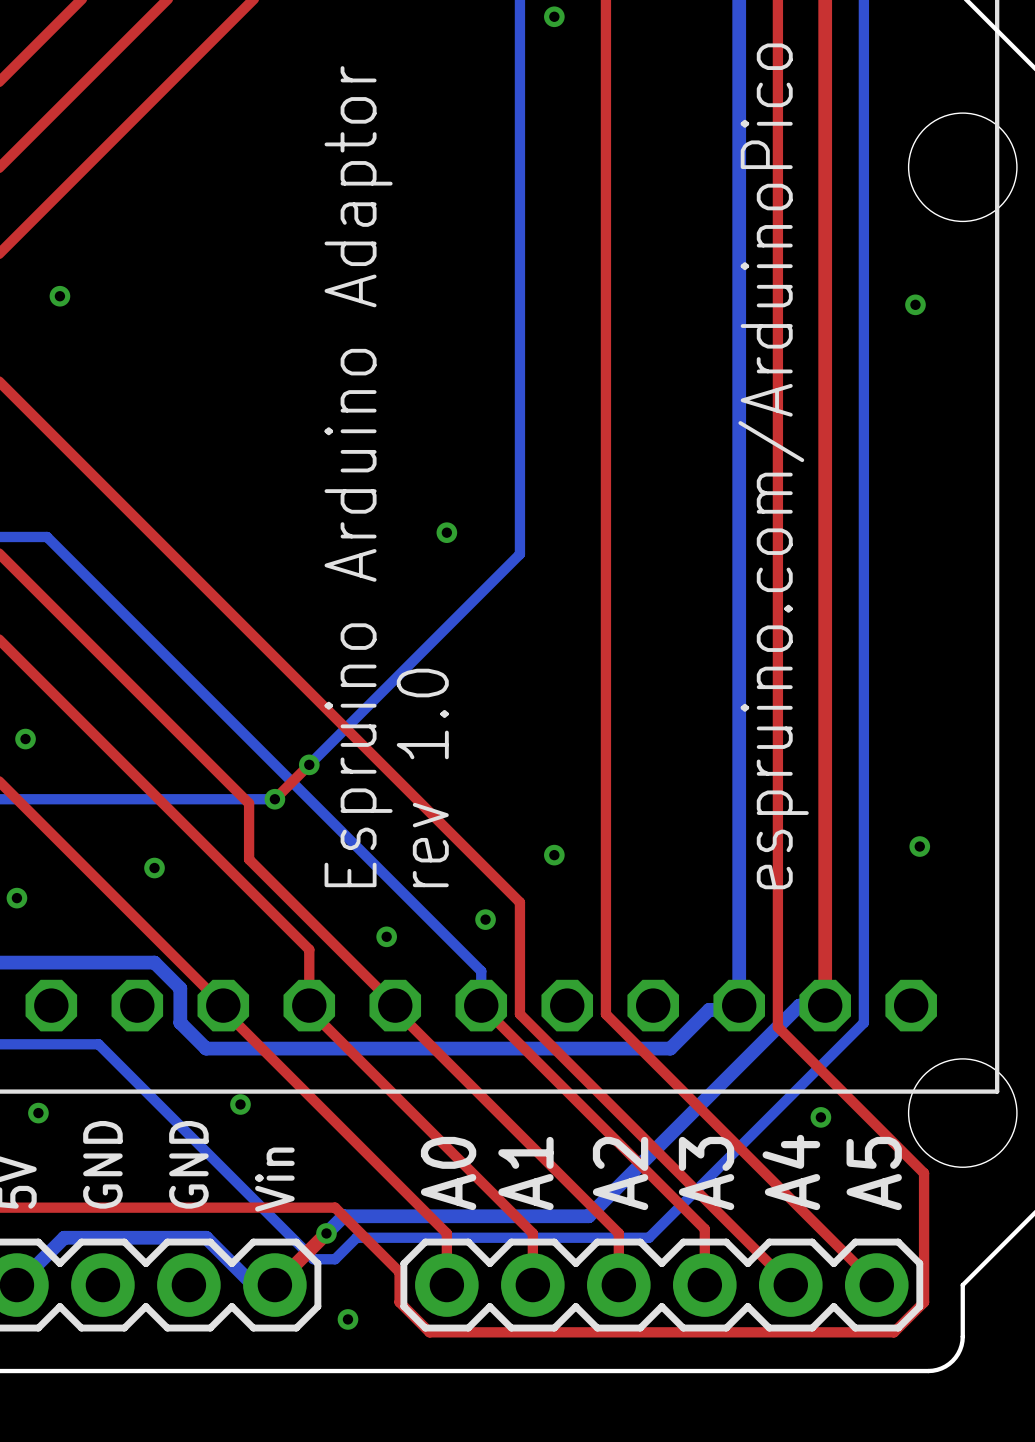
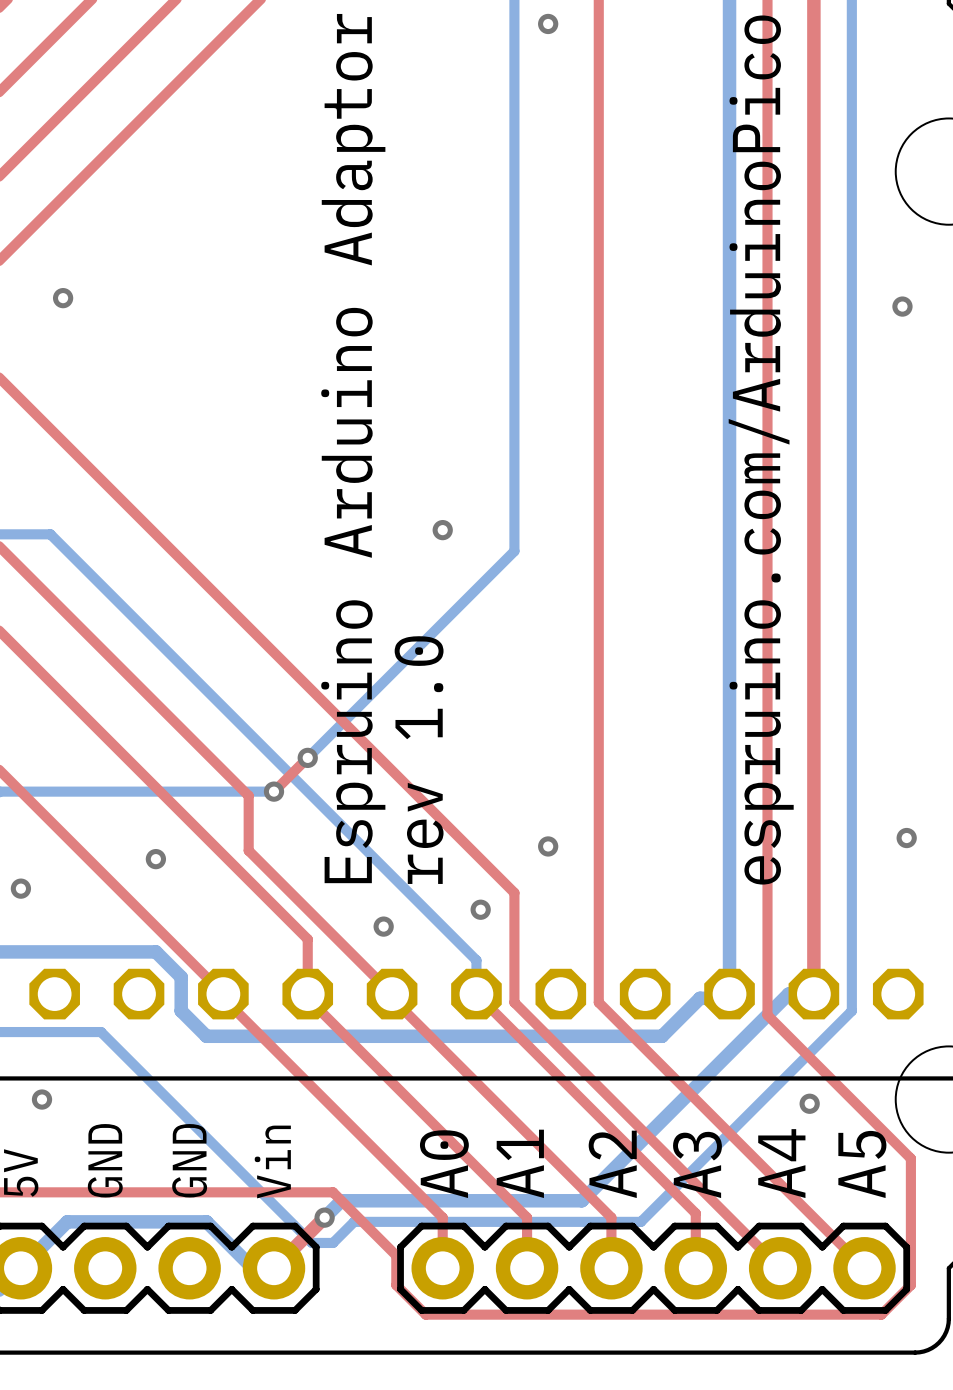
via: (25, 739) -> none
via: (240, 1104) -> none
via: (347, 1319) -> none

